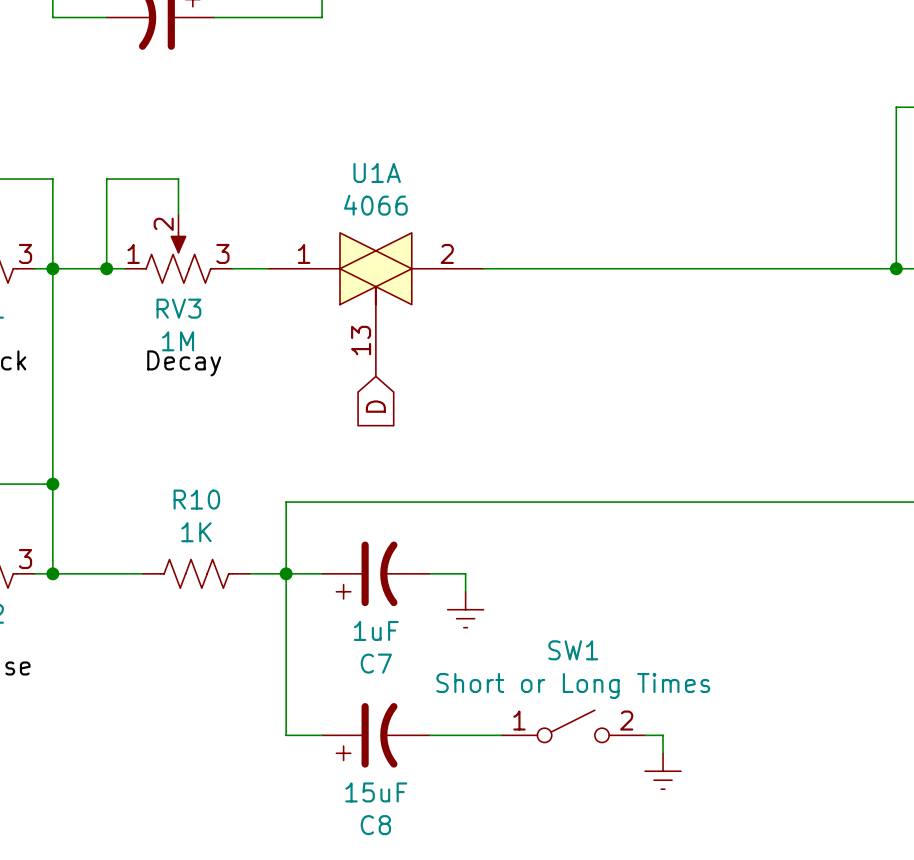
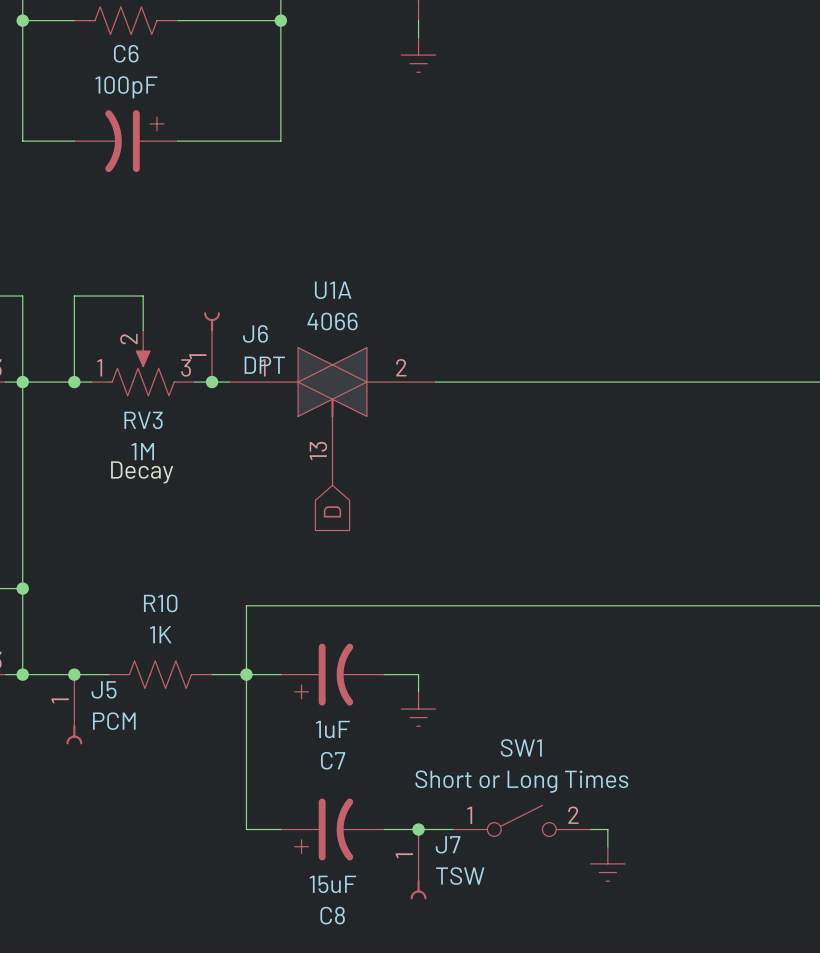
J6: none -> DPT (212, 347)
junction: none -> (212, 382)
junction: none -> (74, 674)
J5: none -> PCM (74, 709)
junction: none -> (418, 829)
J7: none -> TSW (418, 864)

